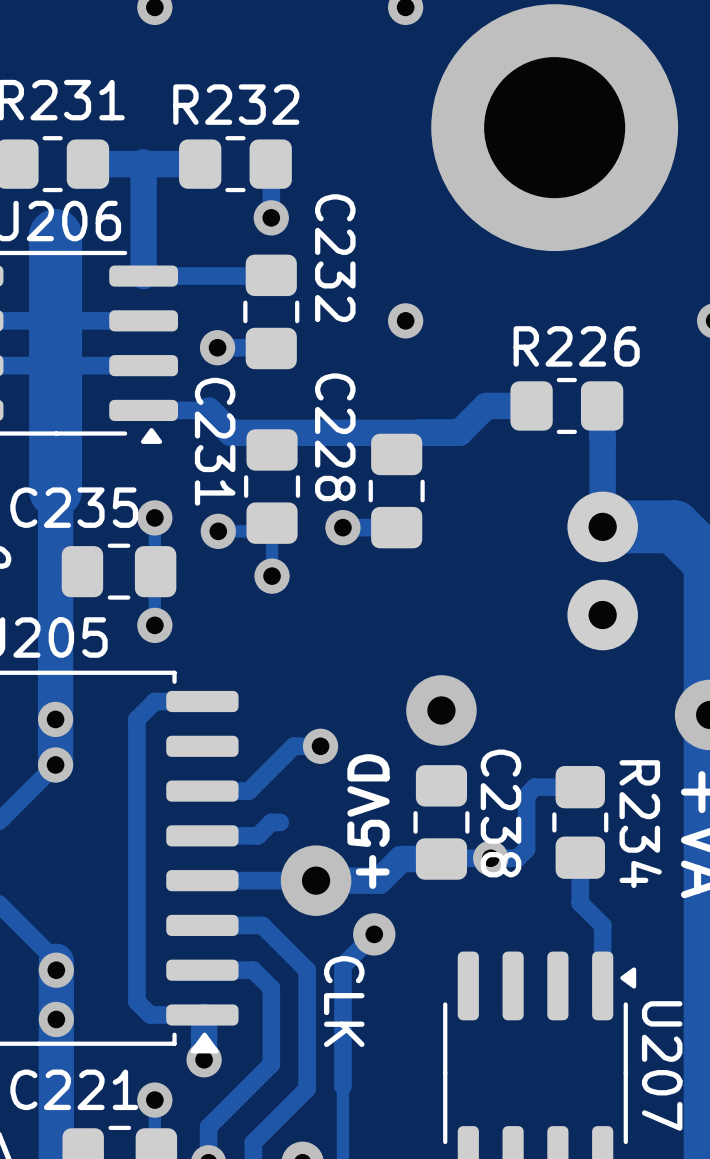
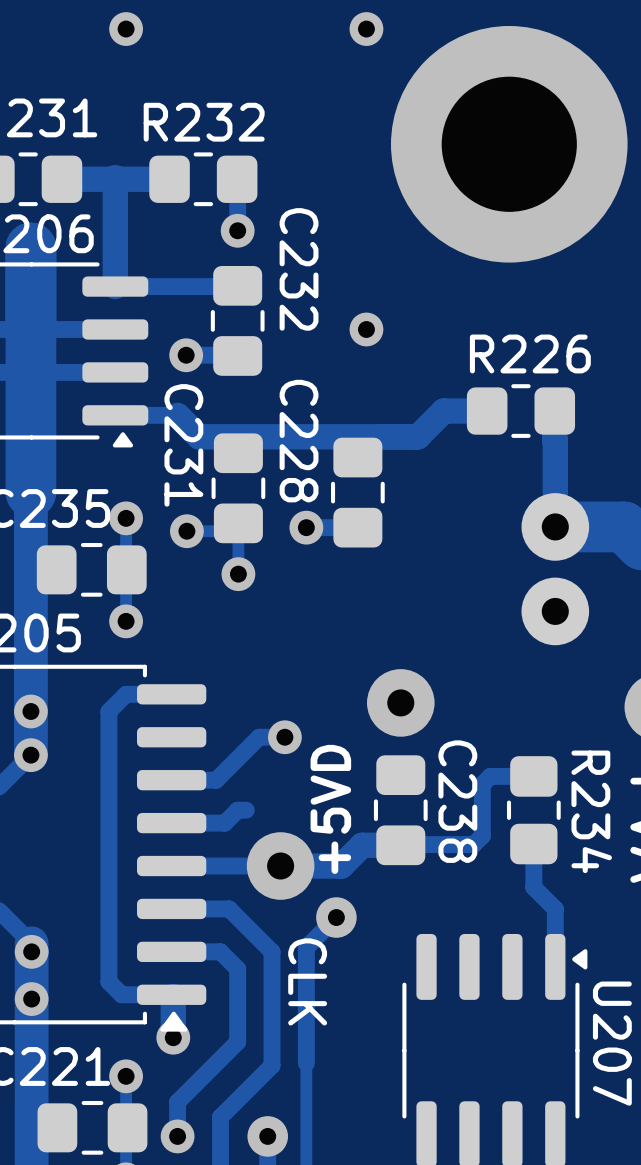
via: (490, 858) -> none

